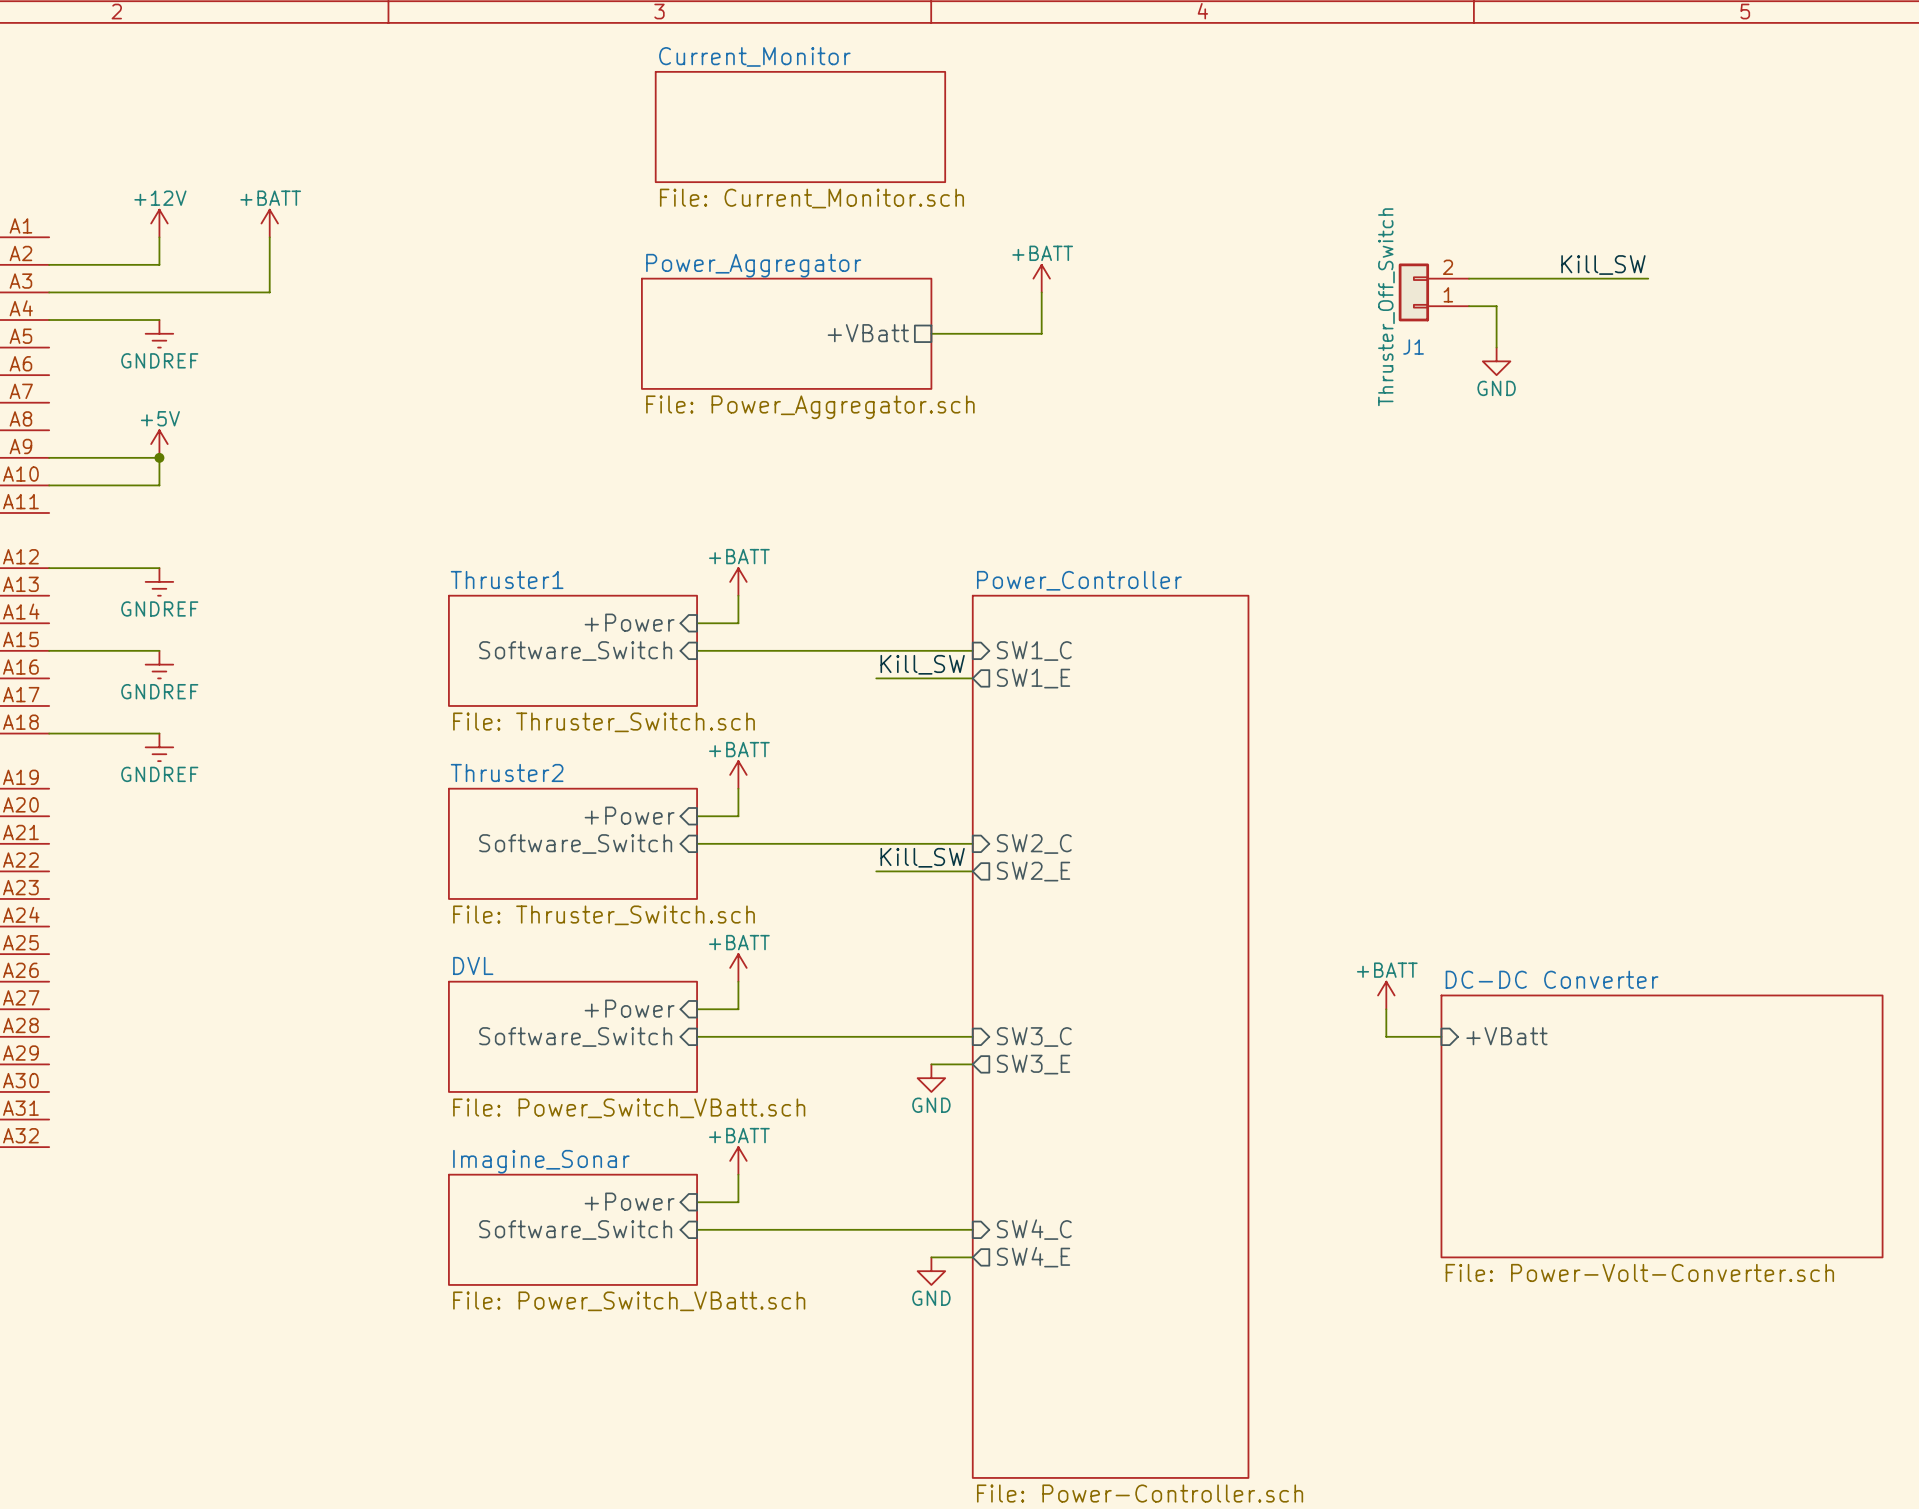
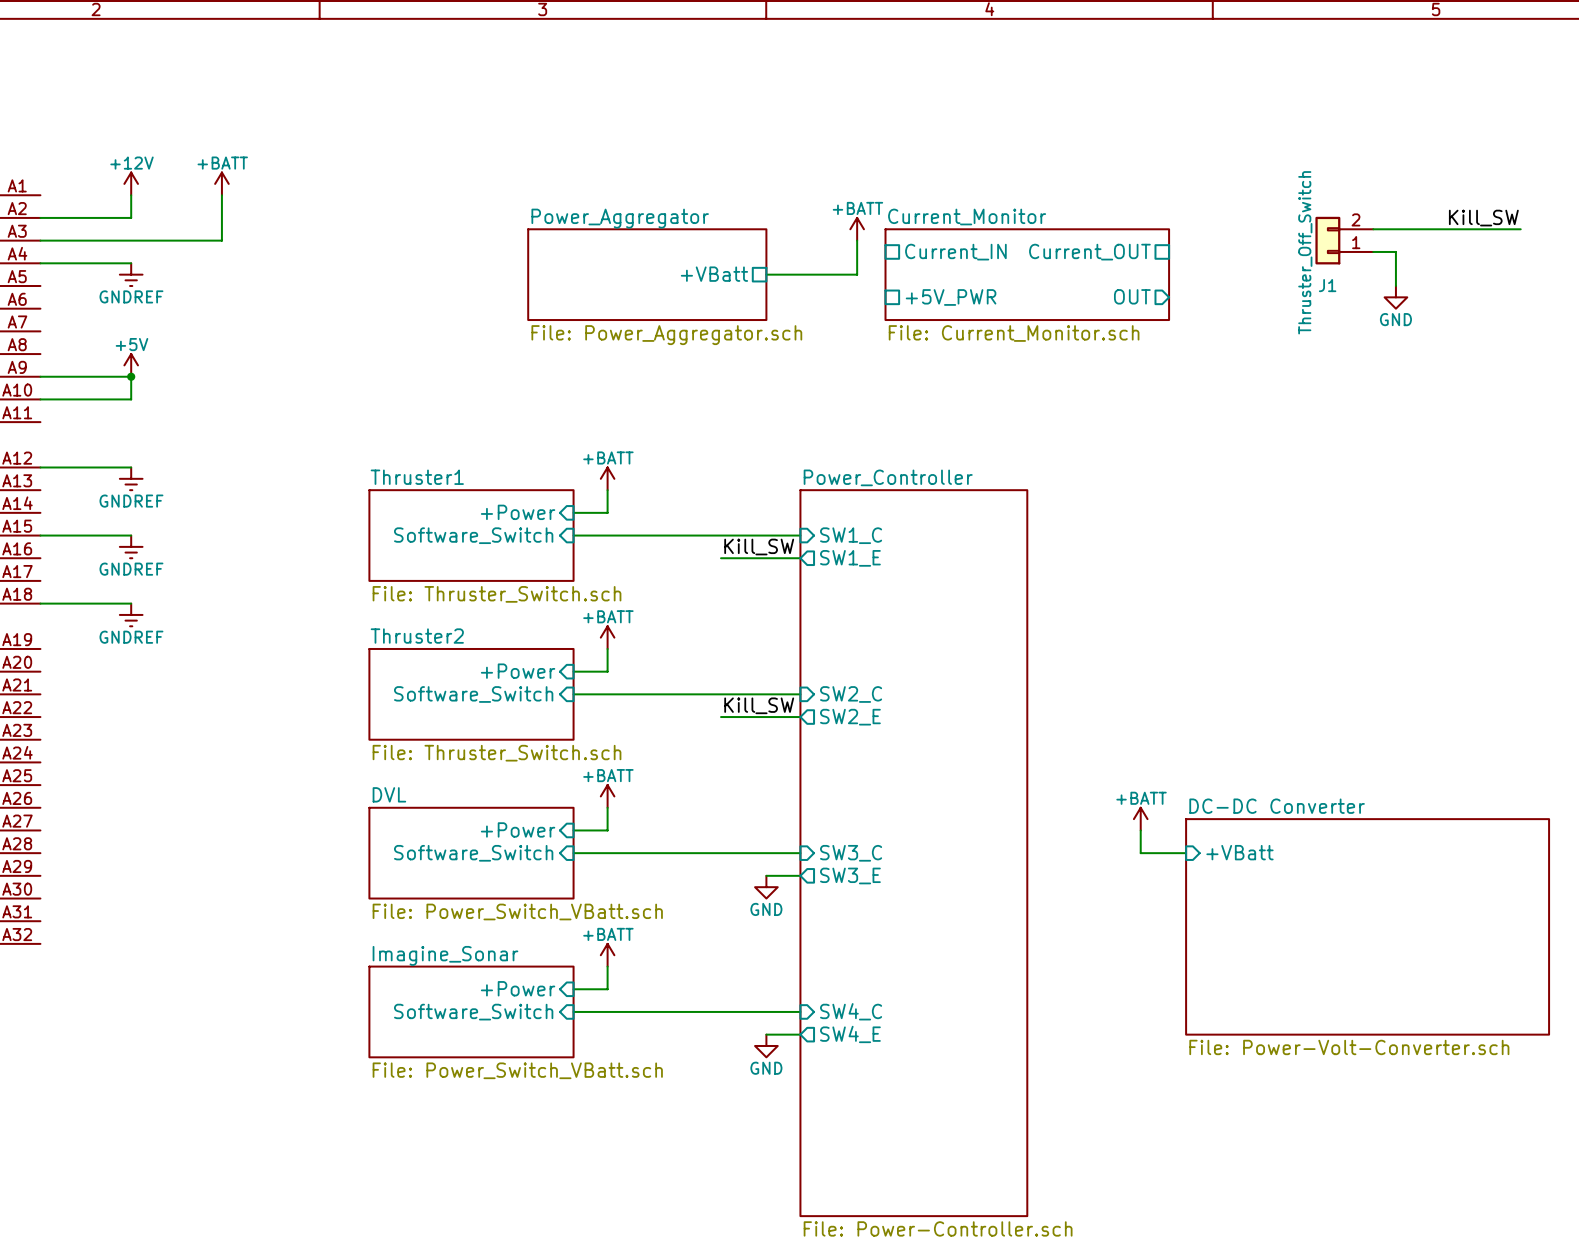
sheet Current_Monitor: File: Current_Monitor.sch (800, 127) -> none
label position: Kill_SW (1603, 265) -> Kill_SW (1483, 218)
wire: (1469, 278) (1648, 278) -> (1373, 229) (1520, 229)
J1 position: (1433, 292) -> (1344, 240)
sheet pin: none -> Current_IN (955, 252)
sheet pin: none -> Current_OUT (1089, 252)
wire: (1469, 306) (1496, 306) (1496, 347) -> (1373, 251) (1395, 251) (1395, 286)
sheet Current_Monitor: none -> File: Current_Monitor.sch (1027, 274)
sheet pin: none -> OUT (1132, 296)
sheet pin: none -> +5V_PWR (951, 297)
power symbol position: GND (1496, 361) -> GND (1395, 297)

